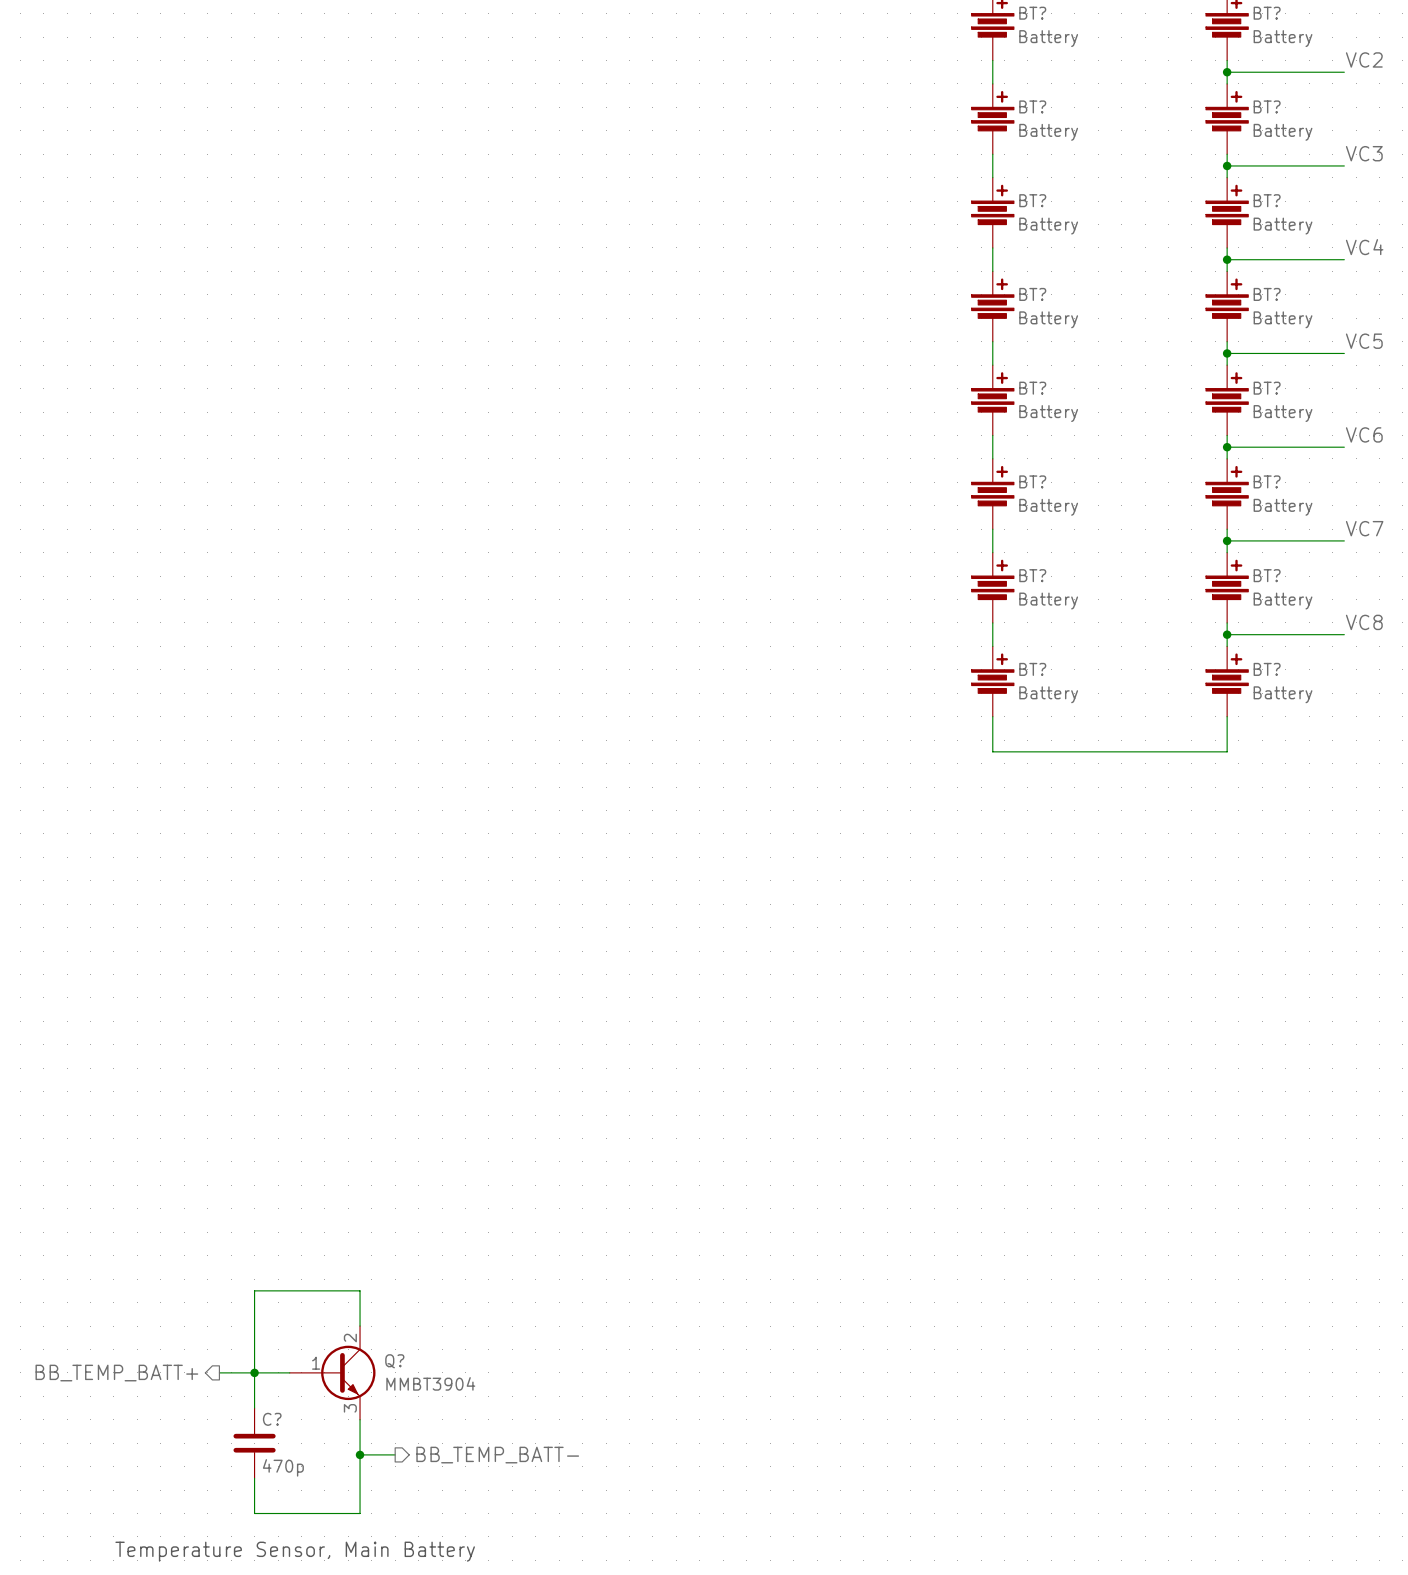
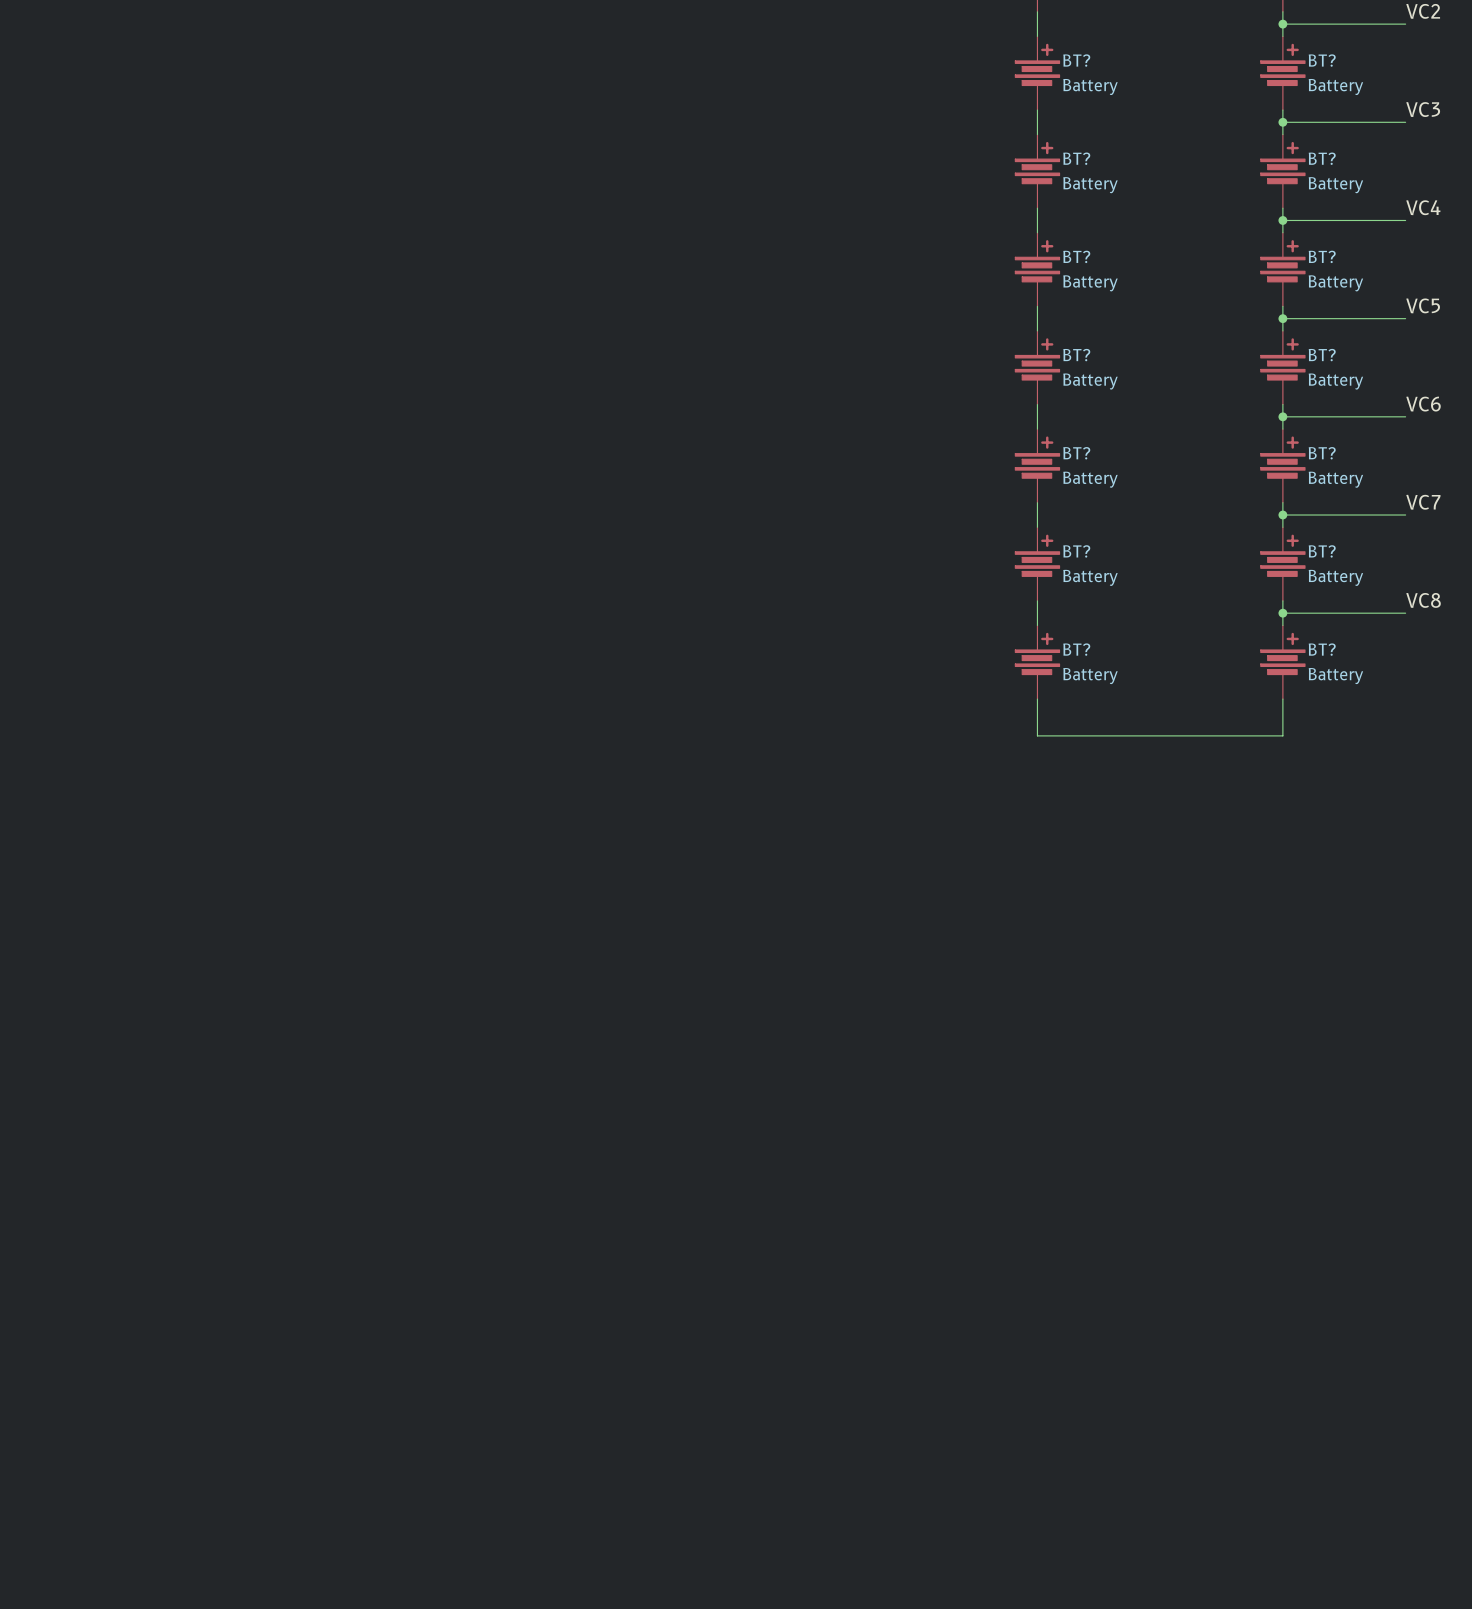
wire: (360, 1326) (360, 1290) (254, 1290) (254, 1408) -> none
wire: (219, 1372) (289, 1372) -> none
junction: (254, 1372) -> none
Q?: MMBT3904 (332, 1372) -> none
hierarchical label: BB_TEMP_BATT+ (116, 1373) -> none
wire: (360, 1419) (360, 1513) (254, 1513) (254, 1478) -> none
C?: 470p (254, 1443) -> none
wire: (360, 1454) (395, 1454) -> none
junction: (360, 1454) -> none
hierarchical label: BB_TEMP_BATT- (497, 1455) -> none
text: Temperature Sensor, Main Battery (295, 1551) -> none

